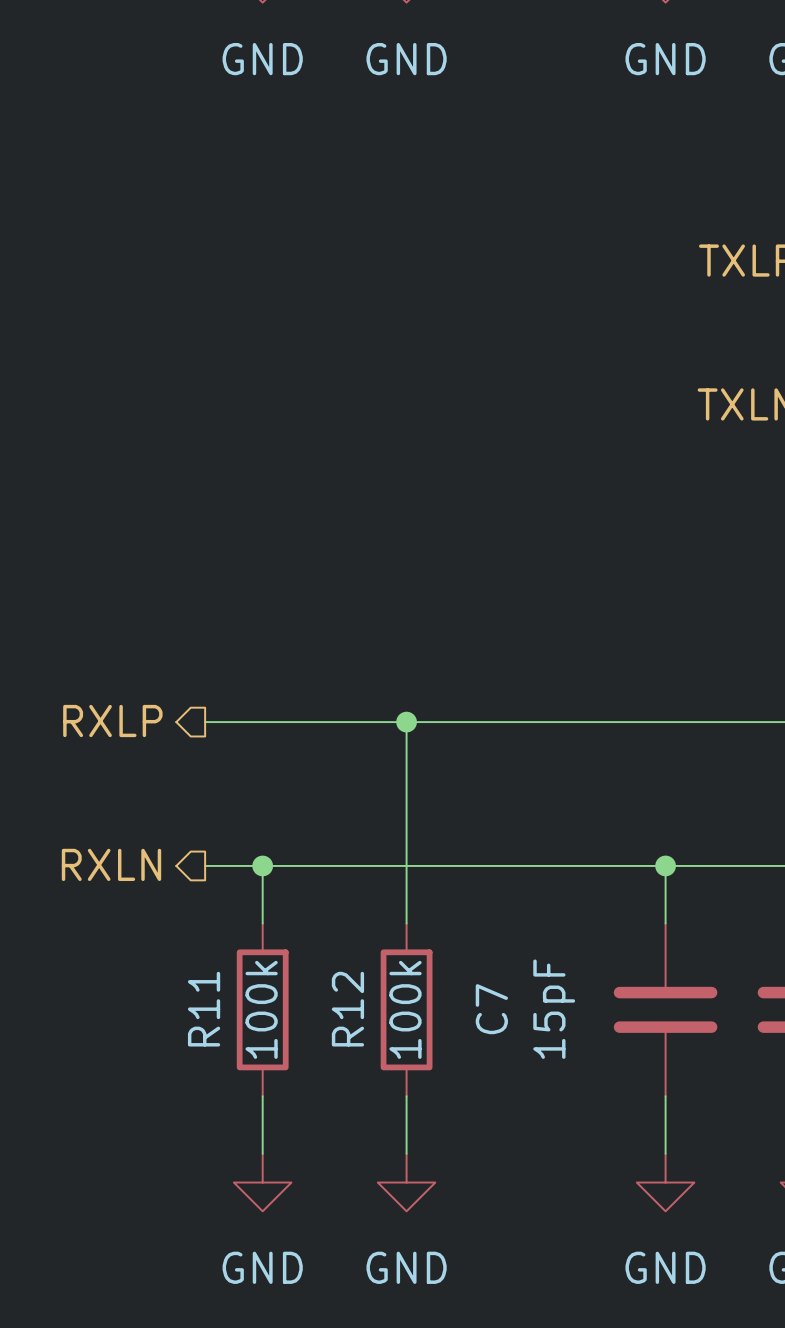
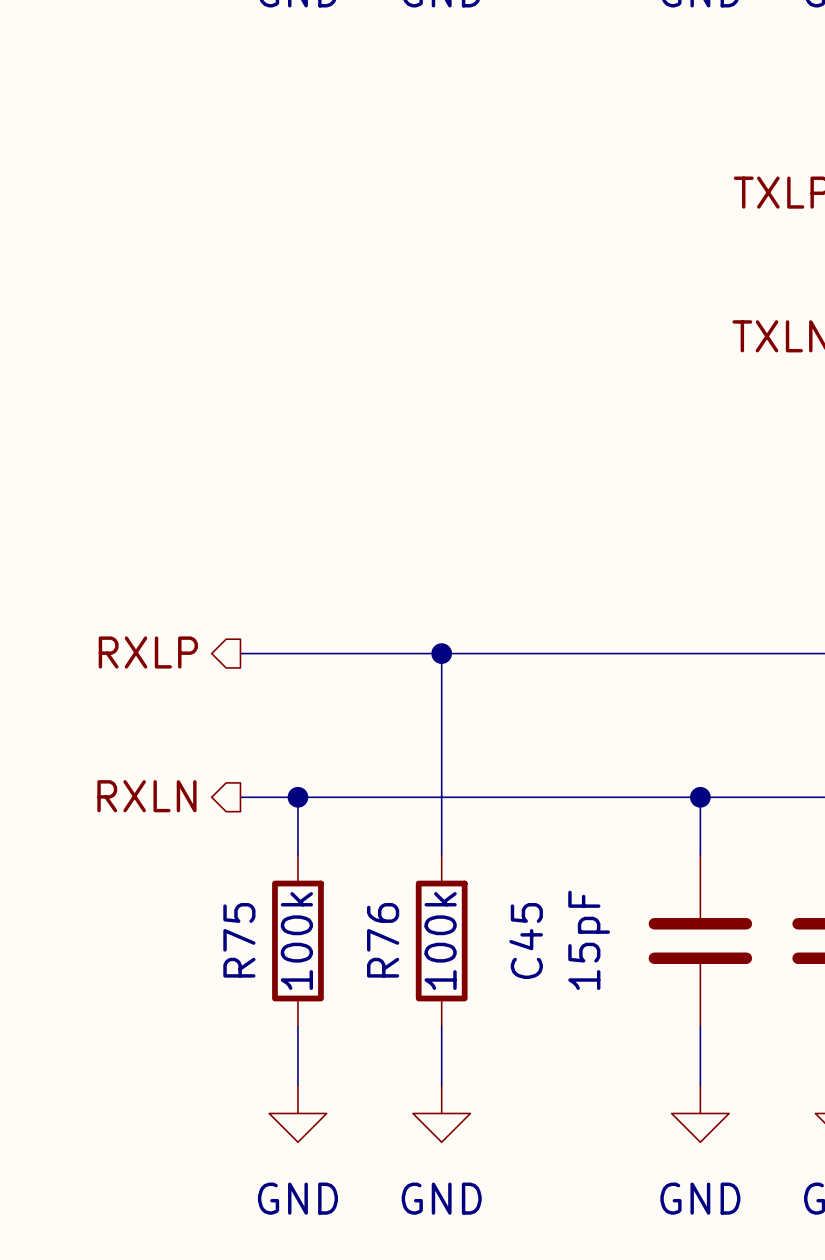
R11 name: R11 (204, 1009) -> R75 (239, 940)
R12 name: R12 (347, 1009) -> R76 (383, 940)
C7 name: C7 (491, 1009) -> C45 (526, 941)

